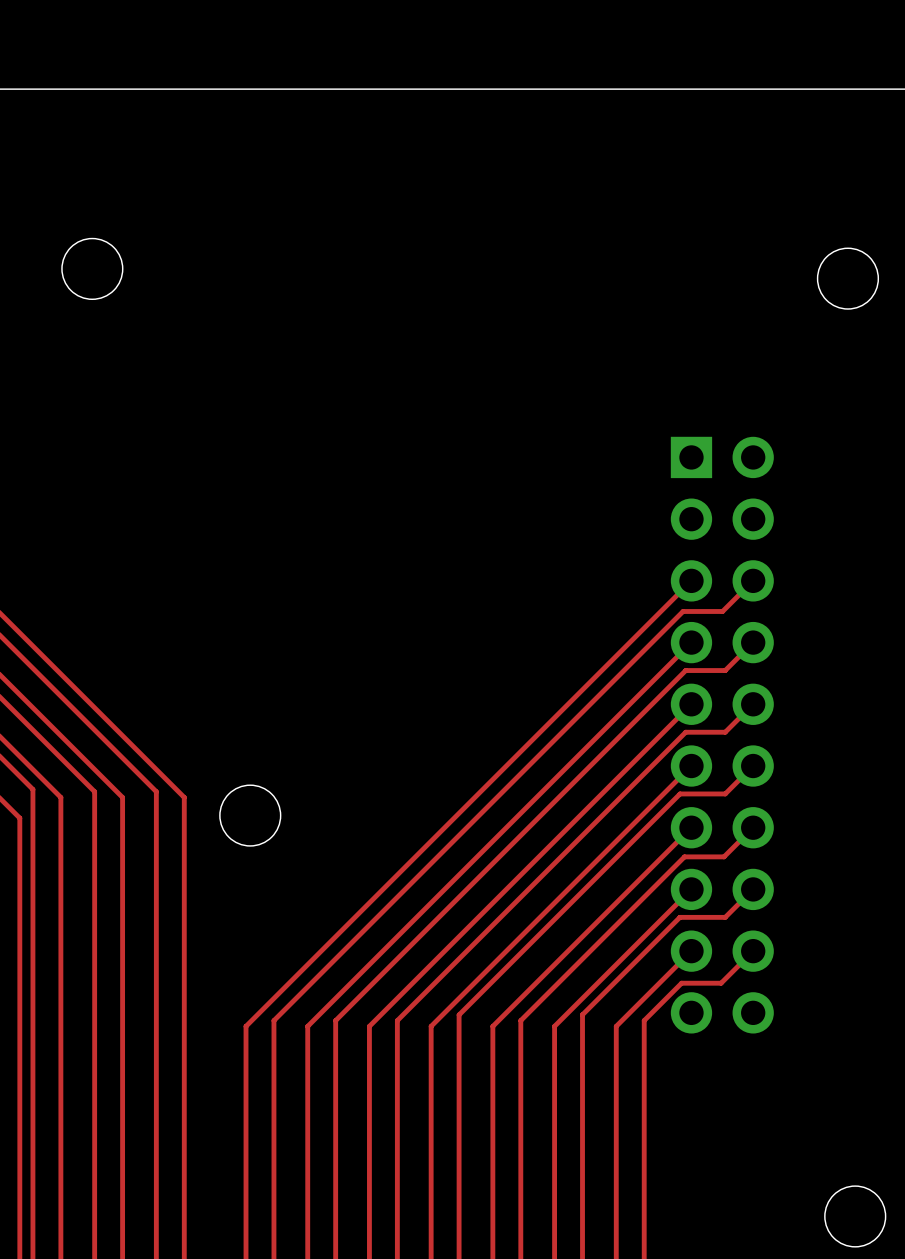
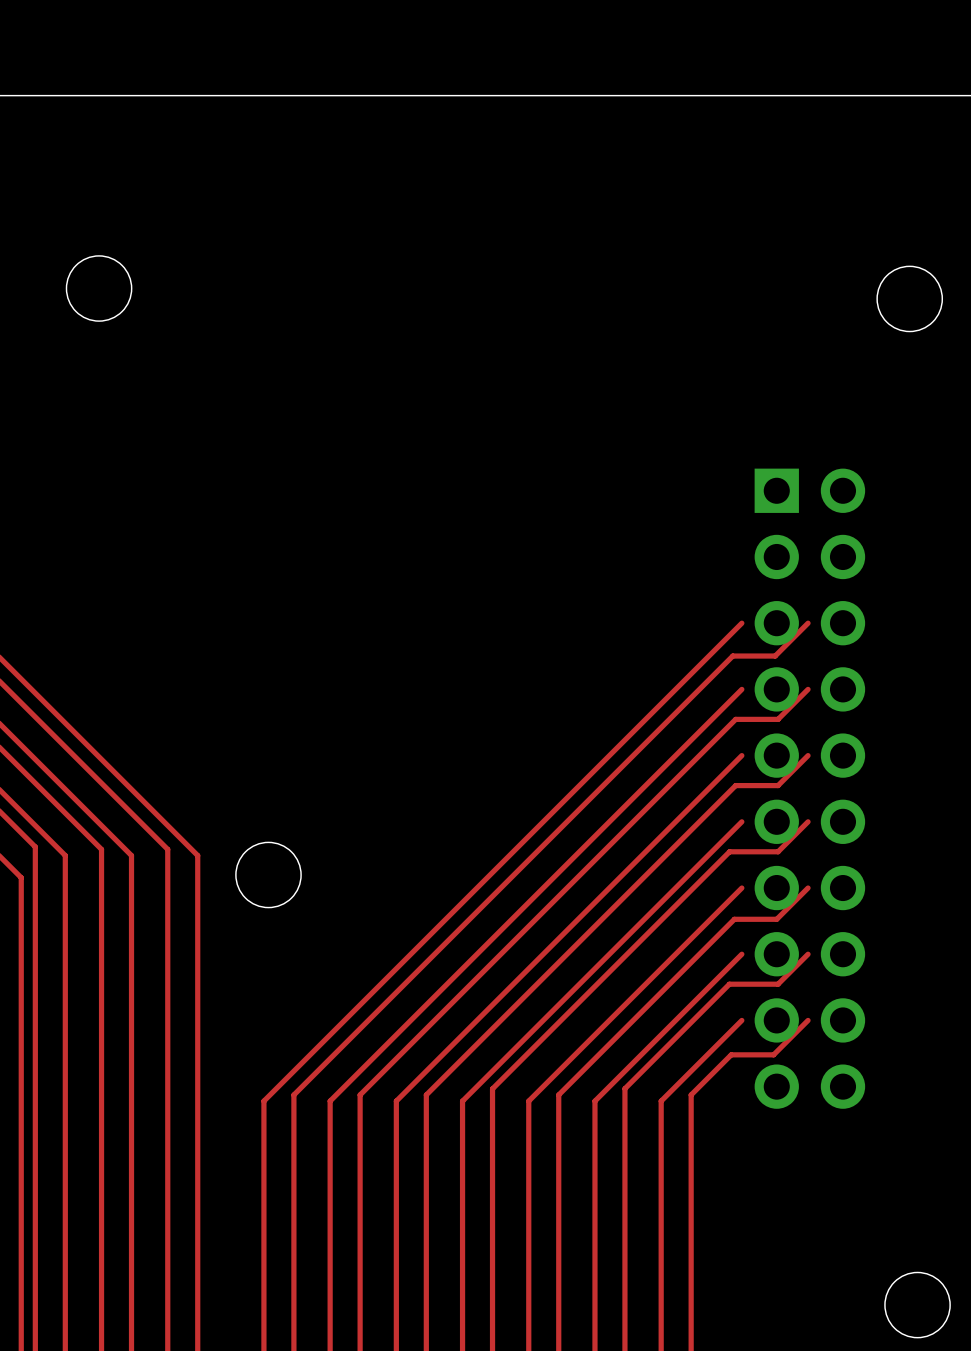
part position: (722, 735) -> (809, 788)

